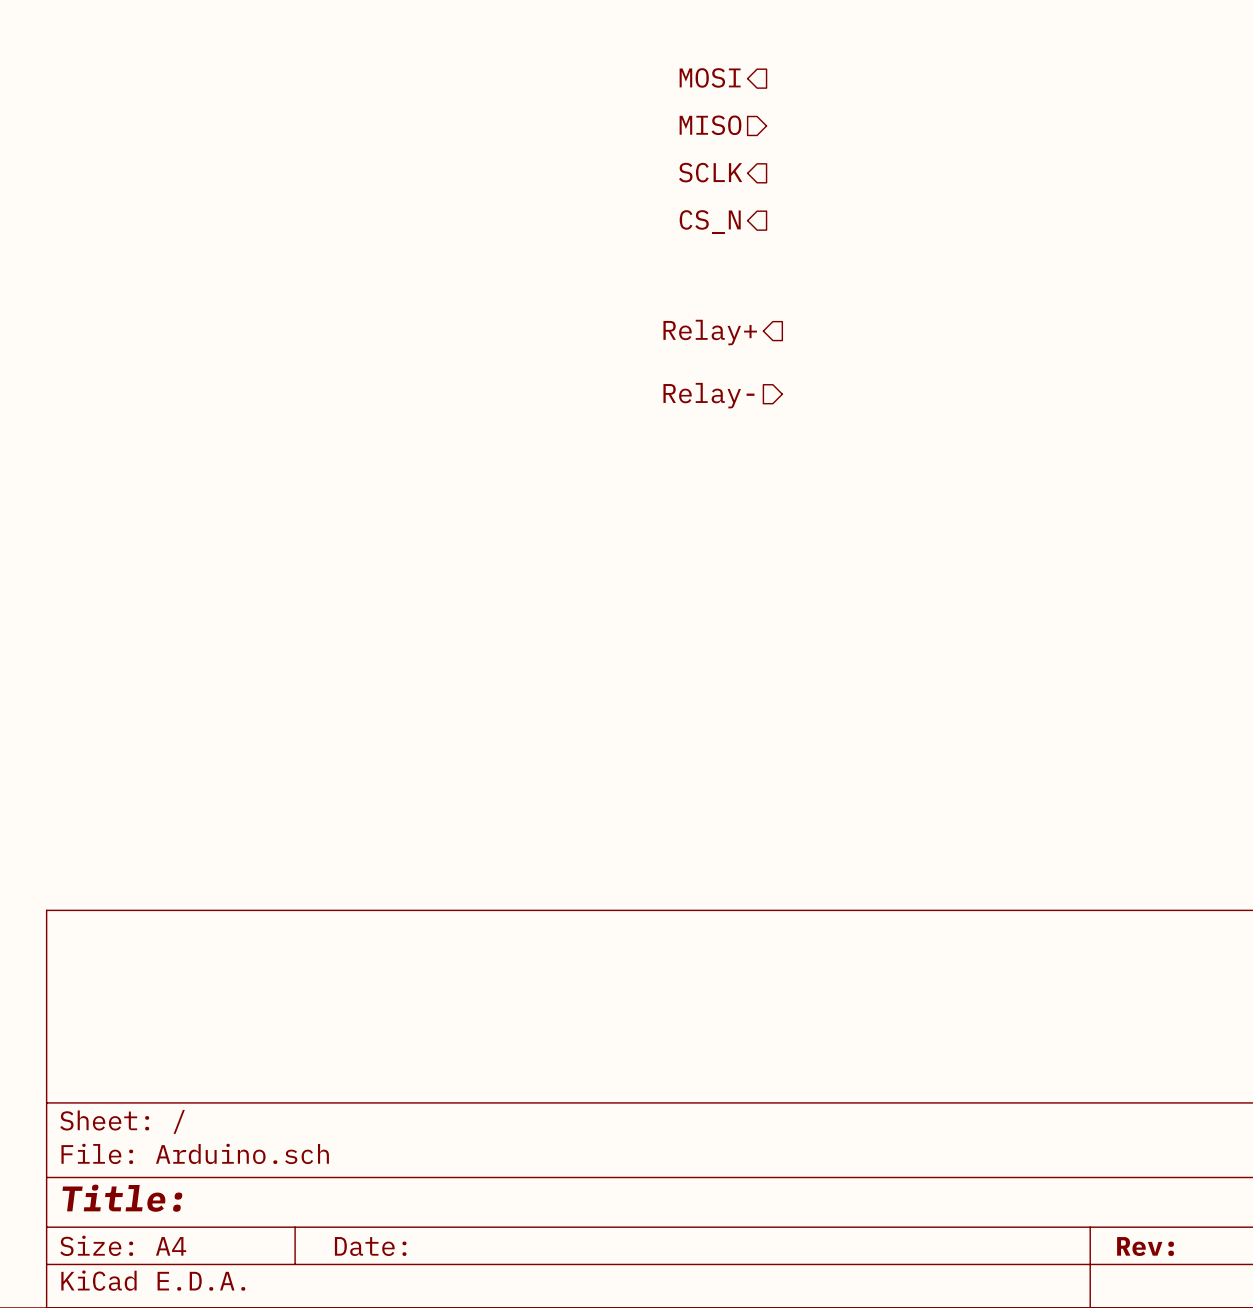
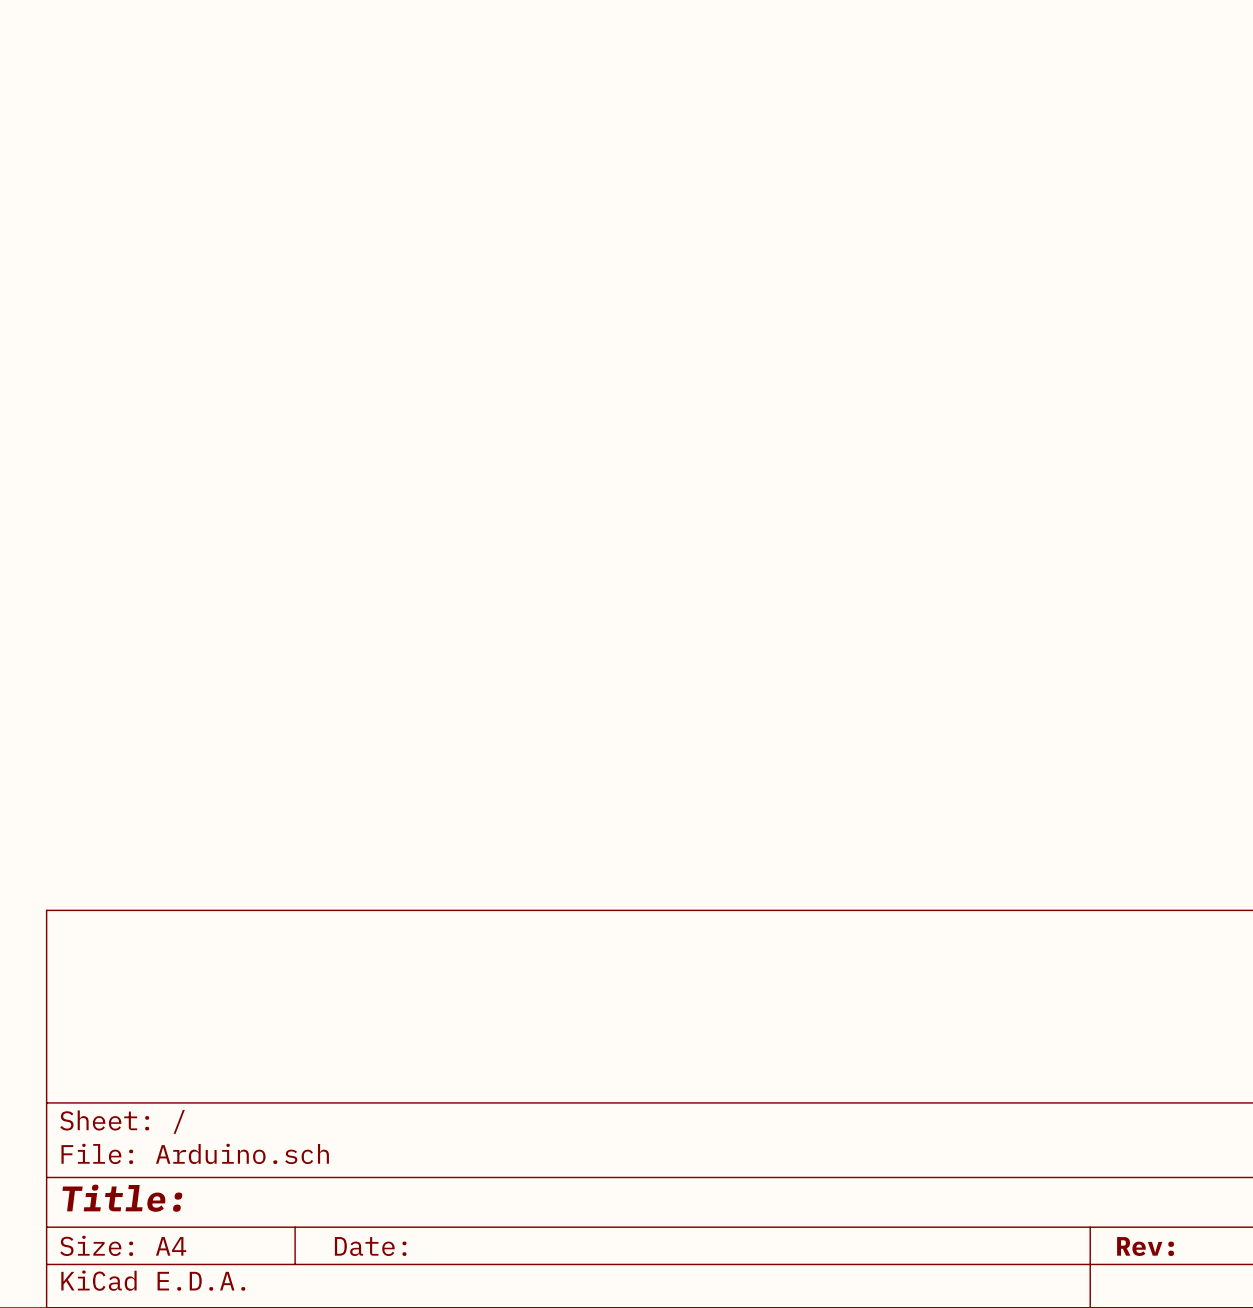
hierarchical label: MOSI (710, 77) -> none
hierarchical label: MISO (710, 125) -> none
hierarchical label: SCLK (710, 172) -> none
hierarchical label: CS_N (710, 222) -> none
hierarchical label: Relay+ (710, 332) -> none
hierarchical label: Relay- (708, 395) -> none

